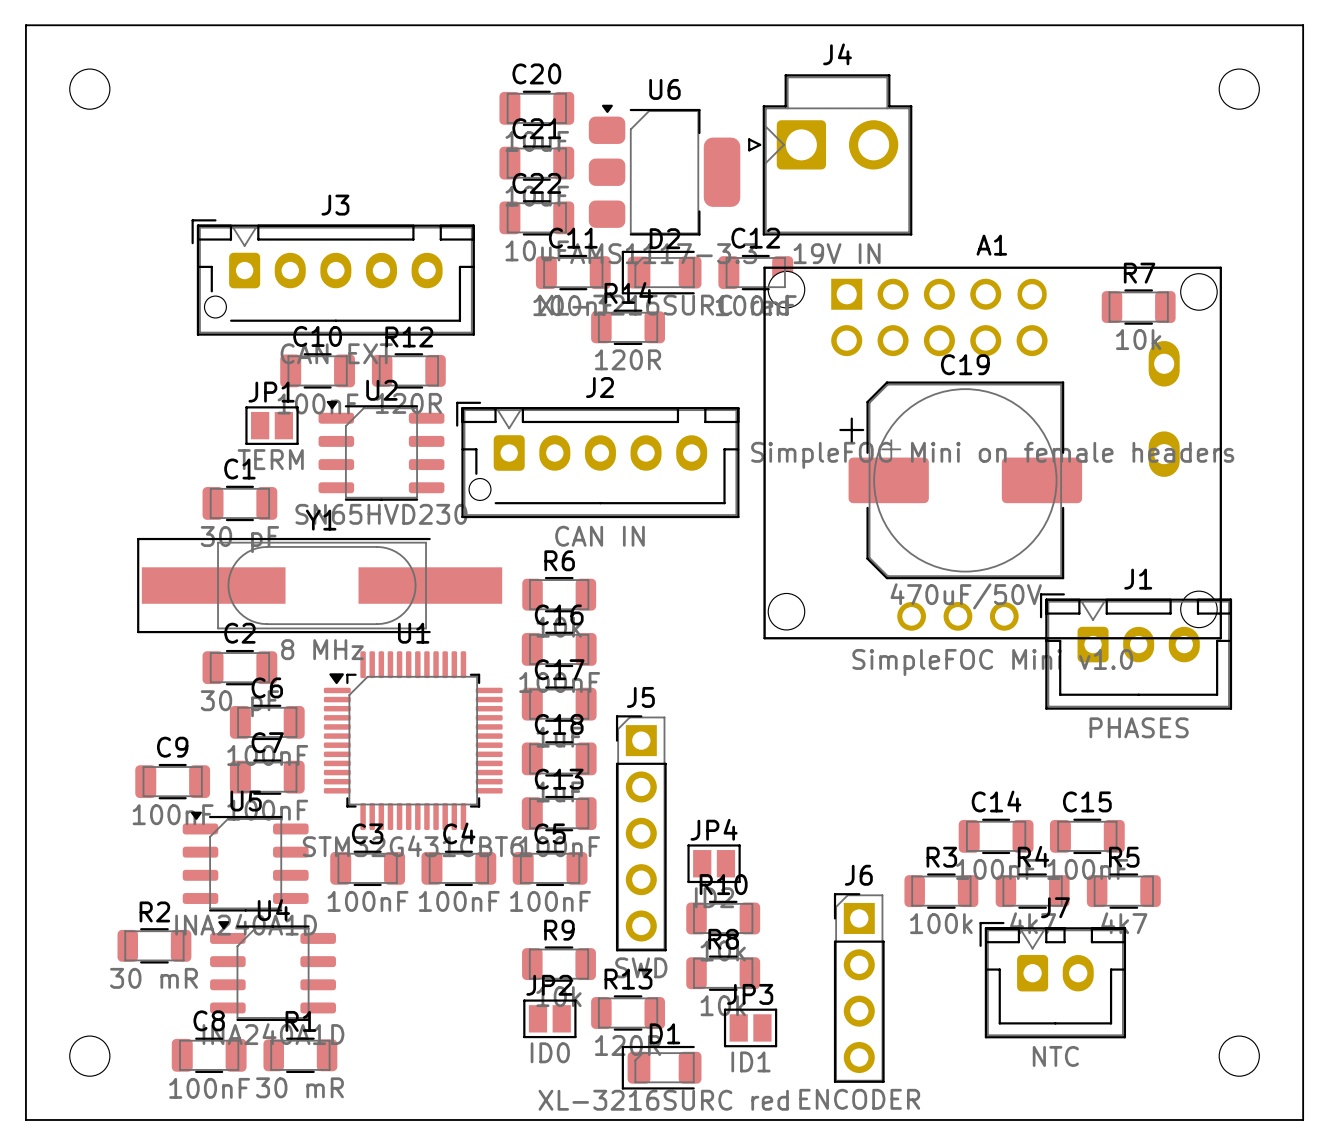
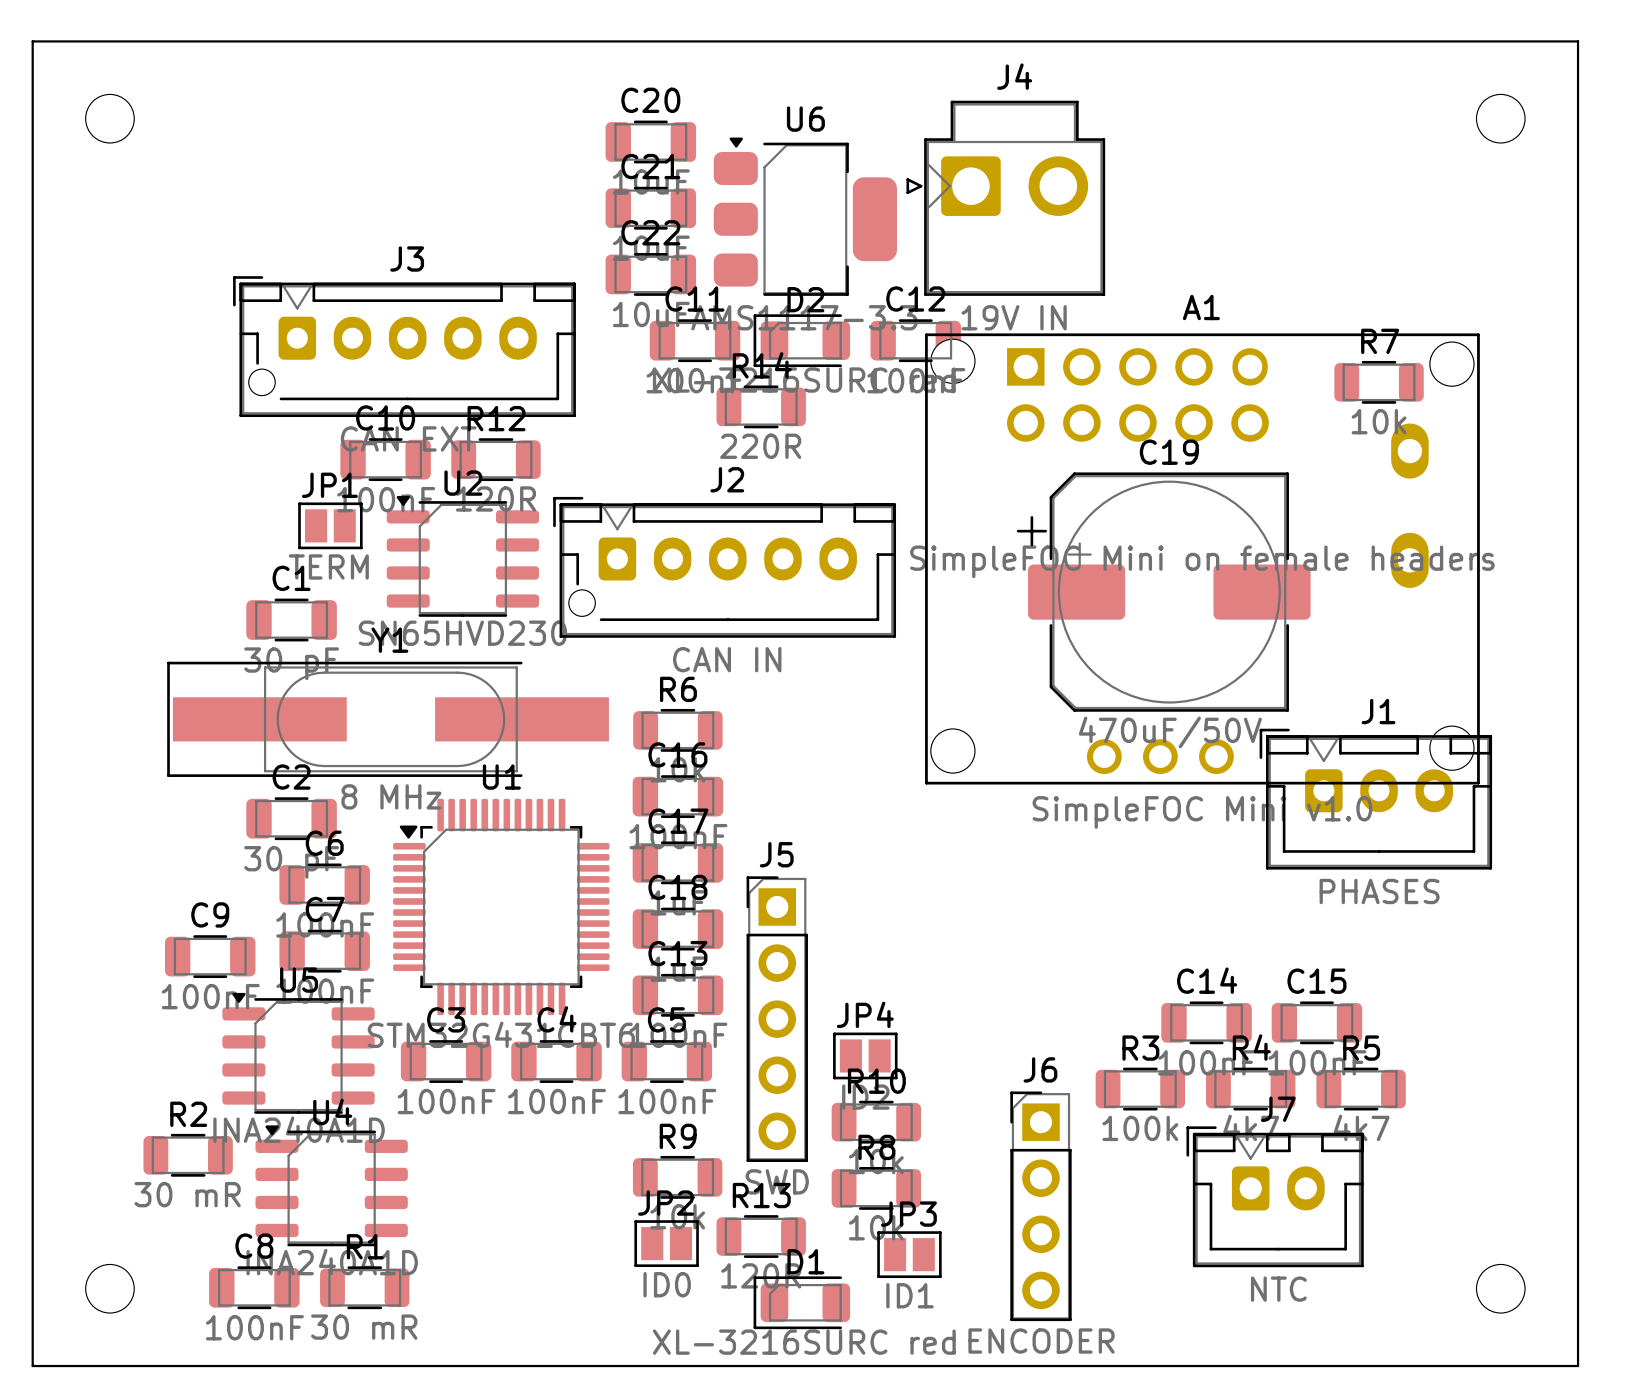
R14 value: 120R (628, 359) -> 220R (760, 446)

